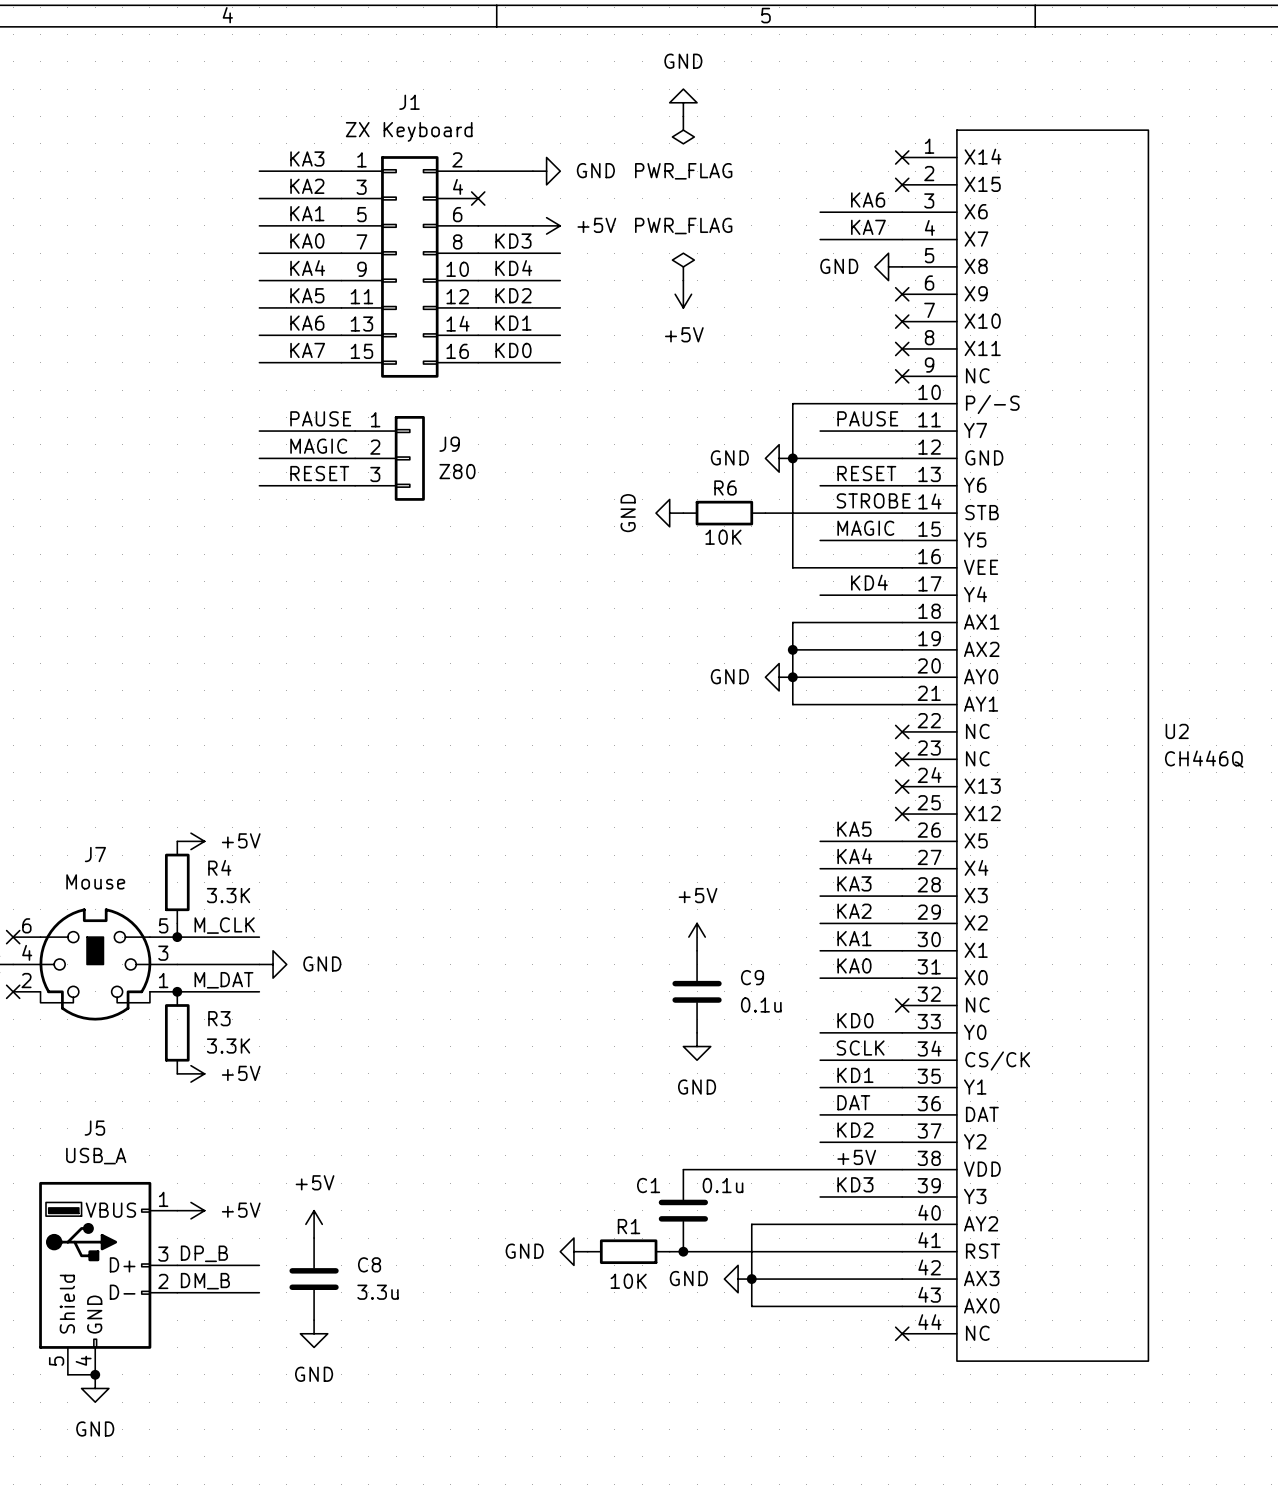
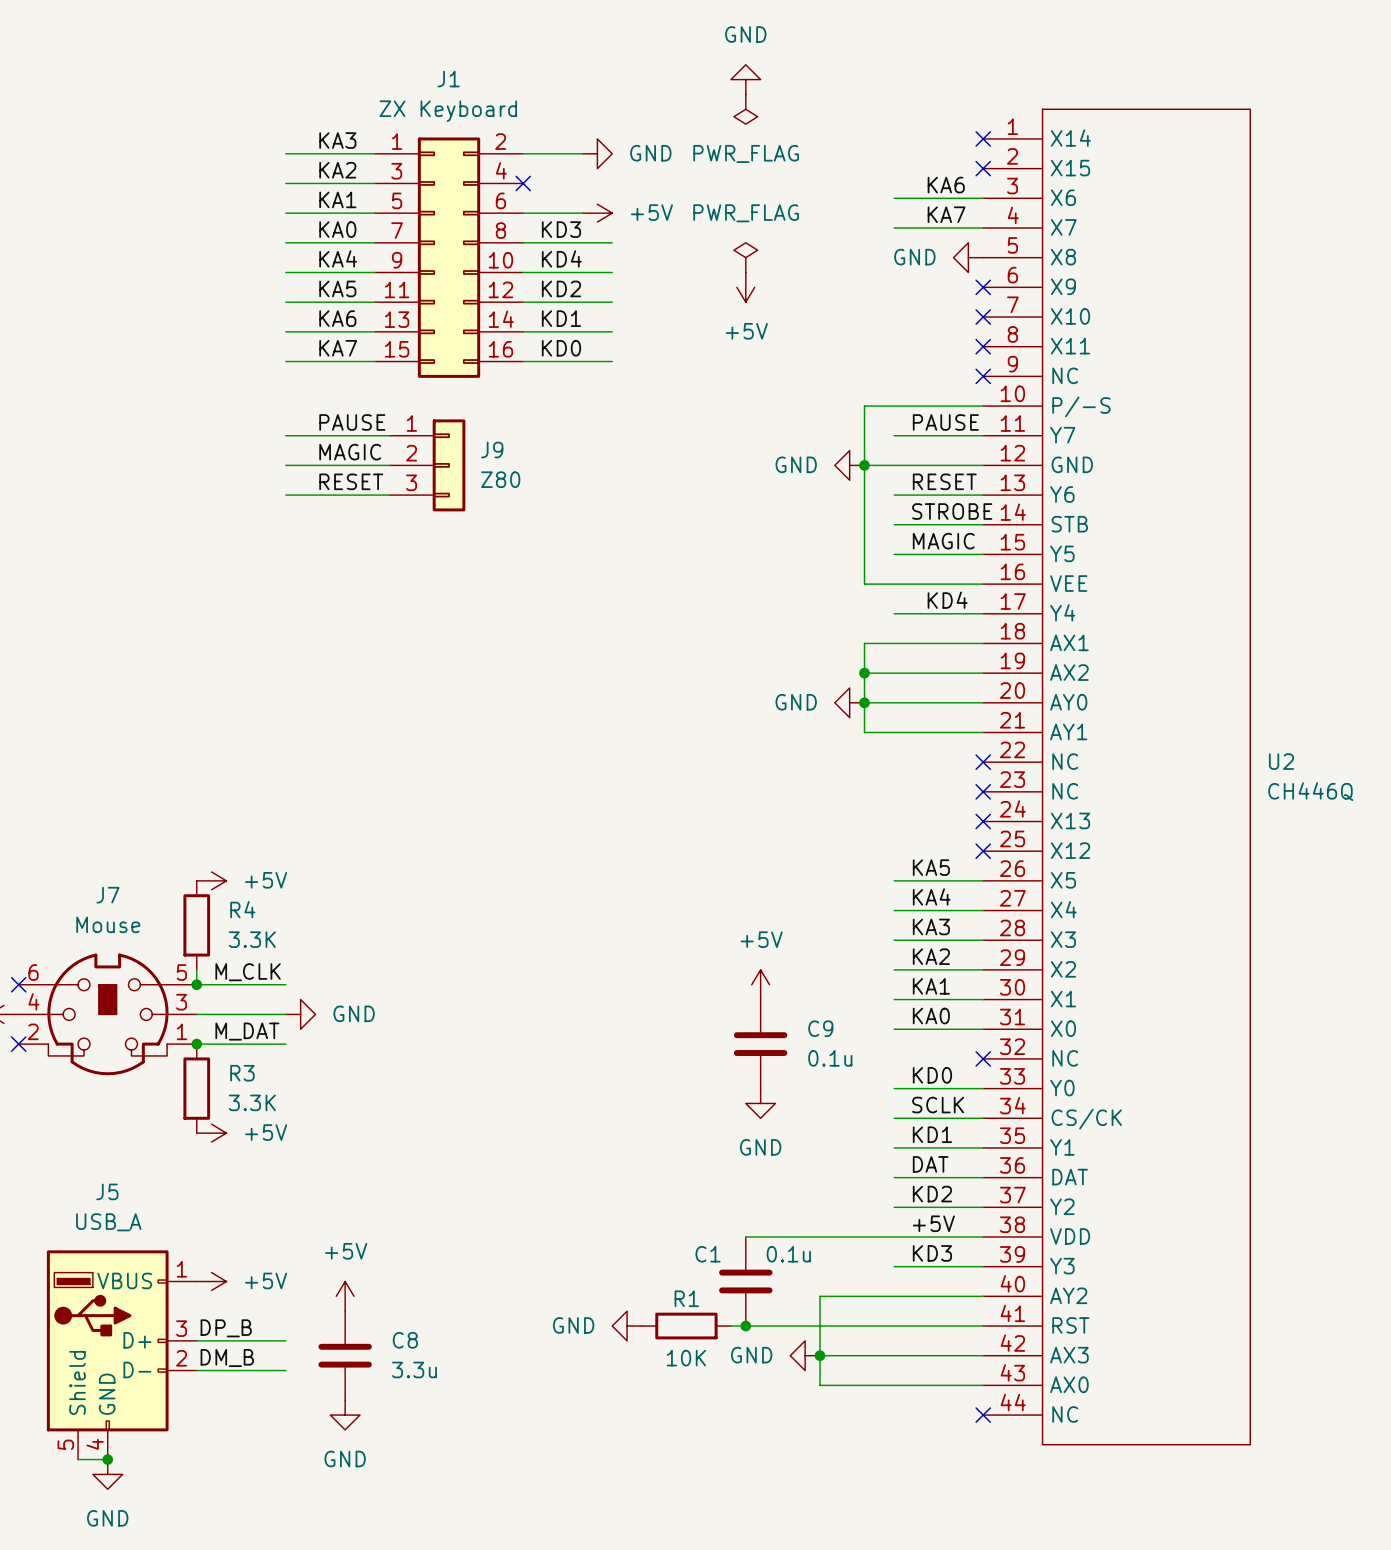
power symbol: GND (669, 513) -> none
R6: 10K (724, 513) -> none
wire: (765, 513) (820, 513) -> none

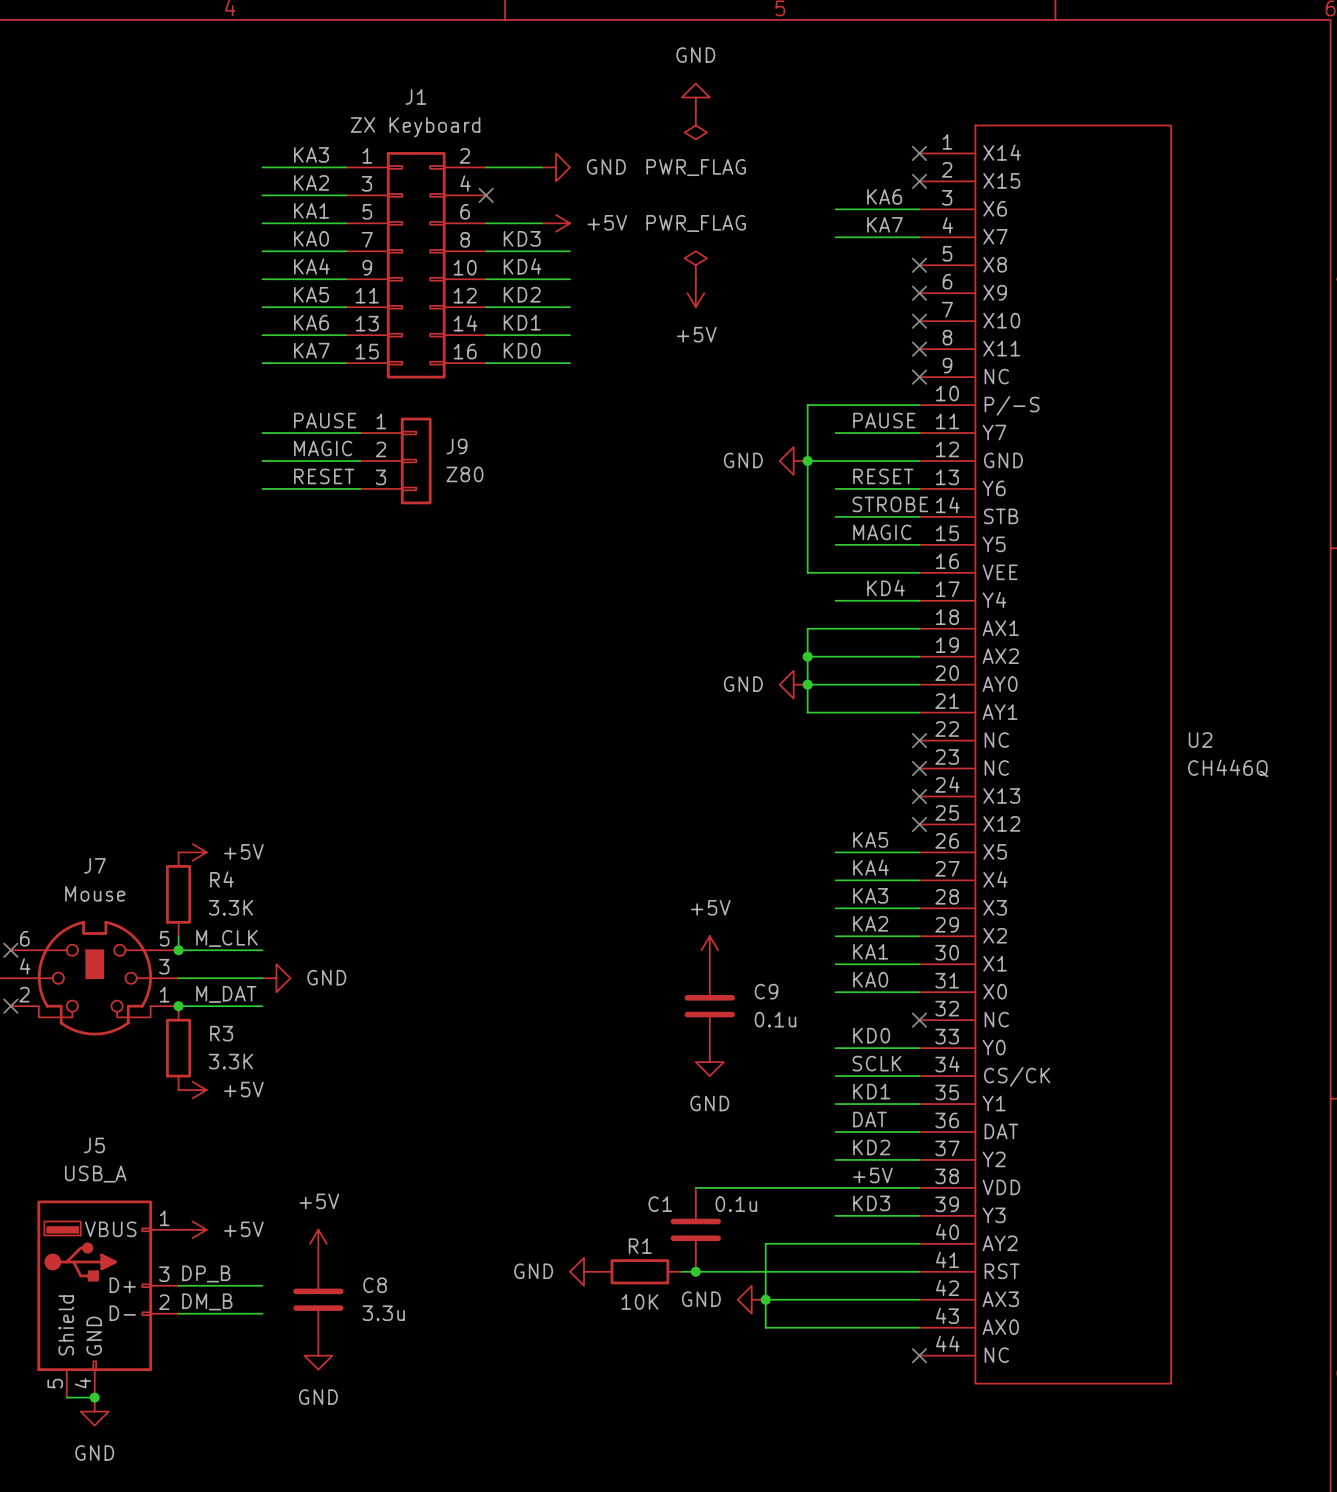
power symbol: GND (968, 257) -> none
no-connect mark: none -> (919, 265)

